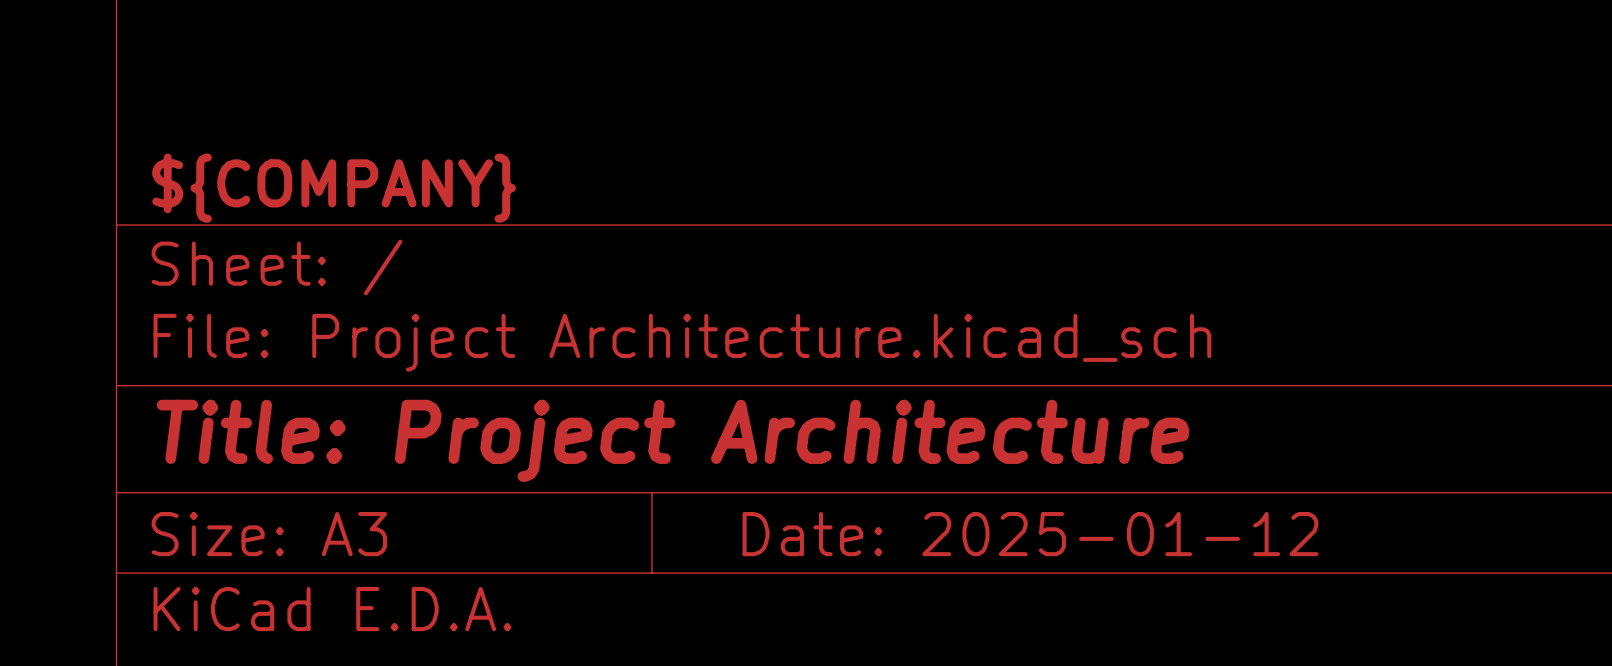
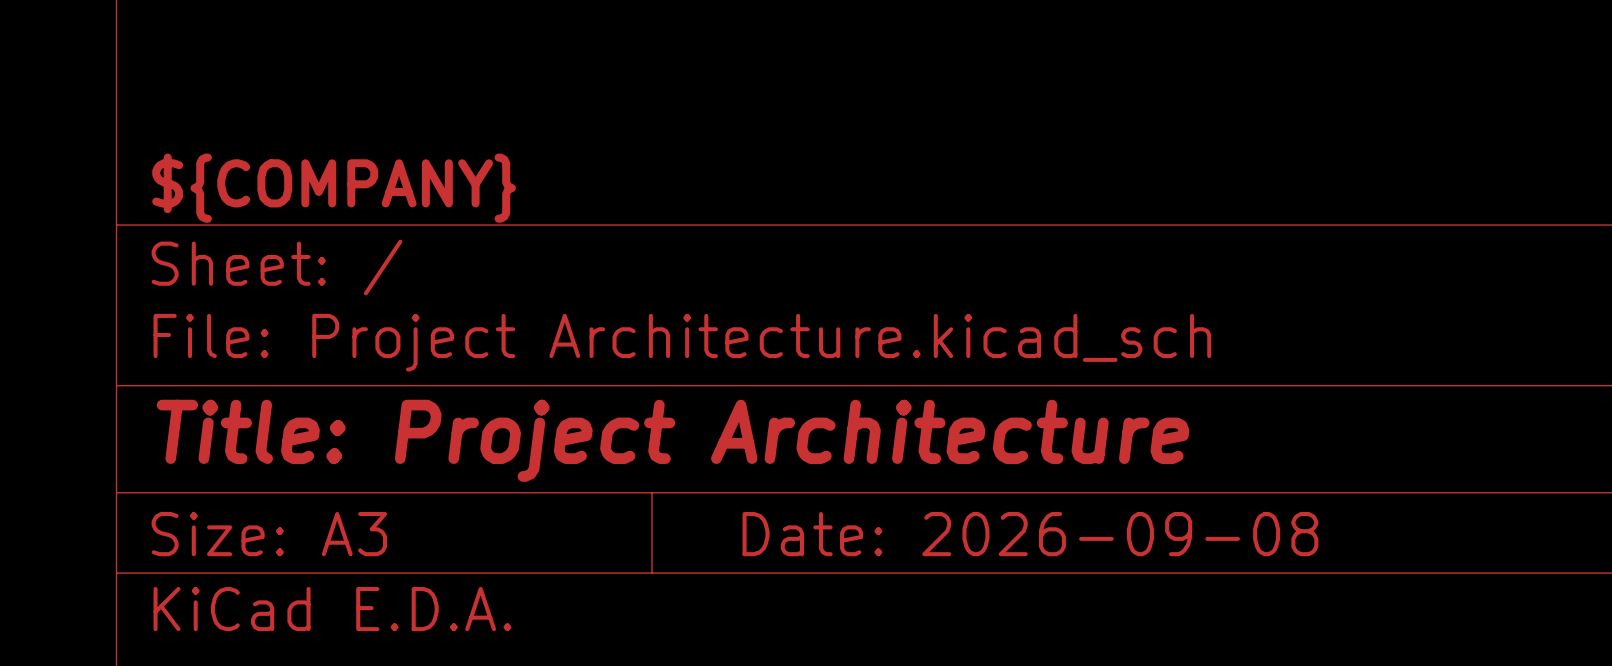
title block: Date: 2025-01-12 (1030, 534) -> Date: 2026-09-08 (1030, 534)

